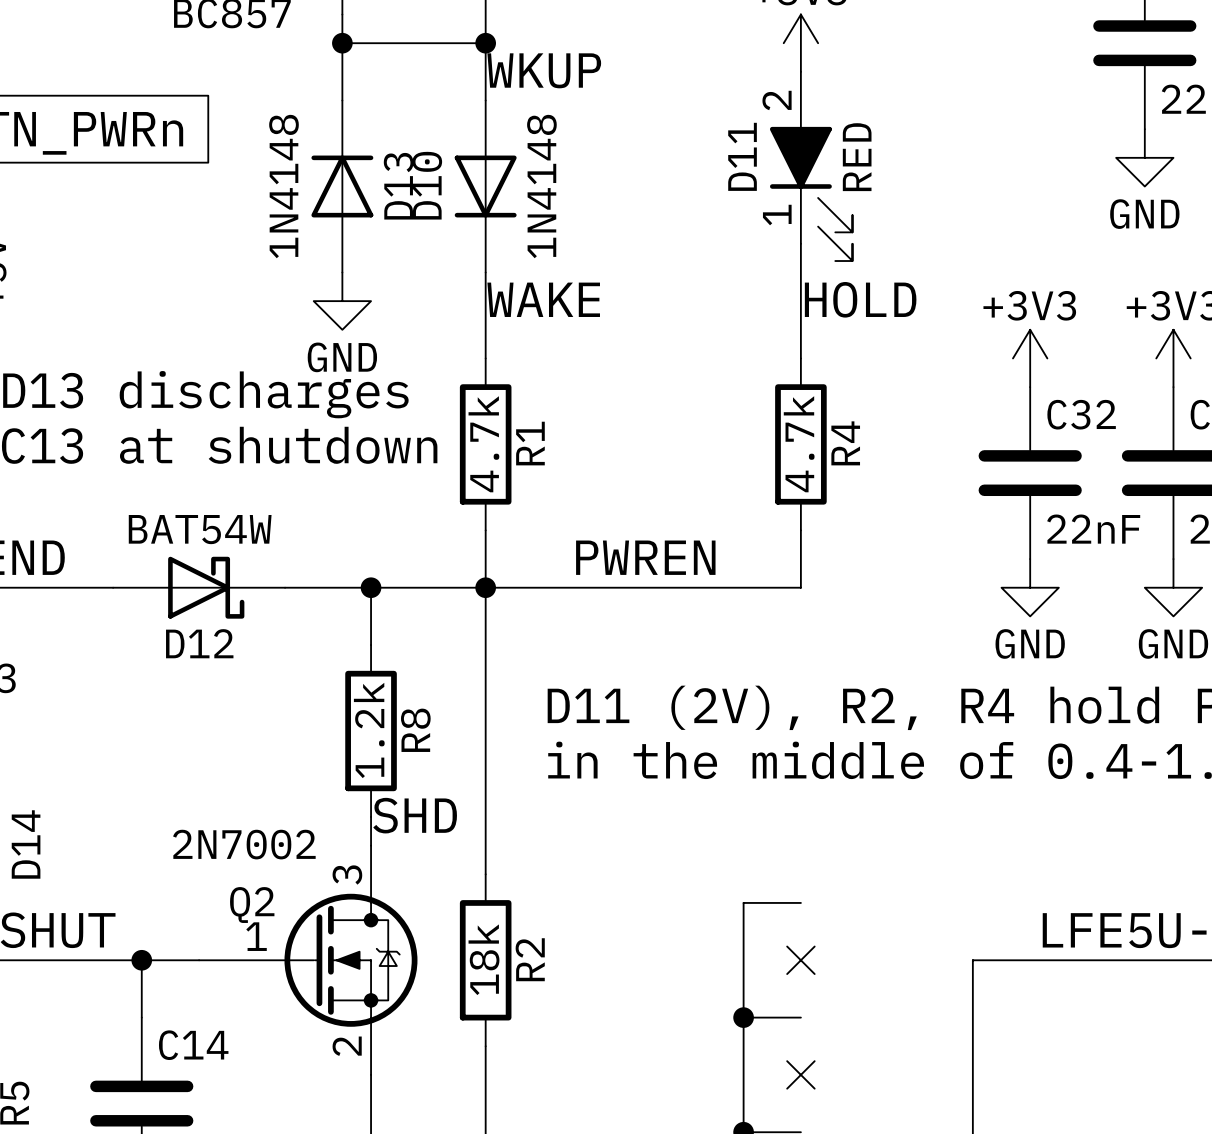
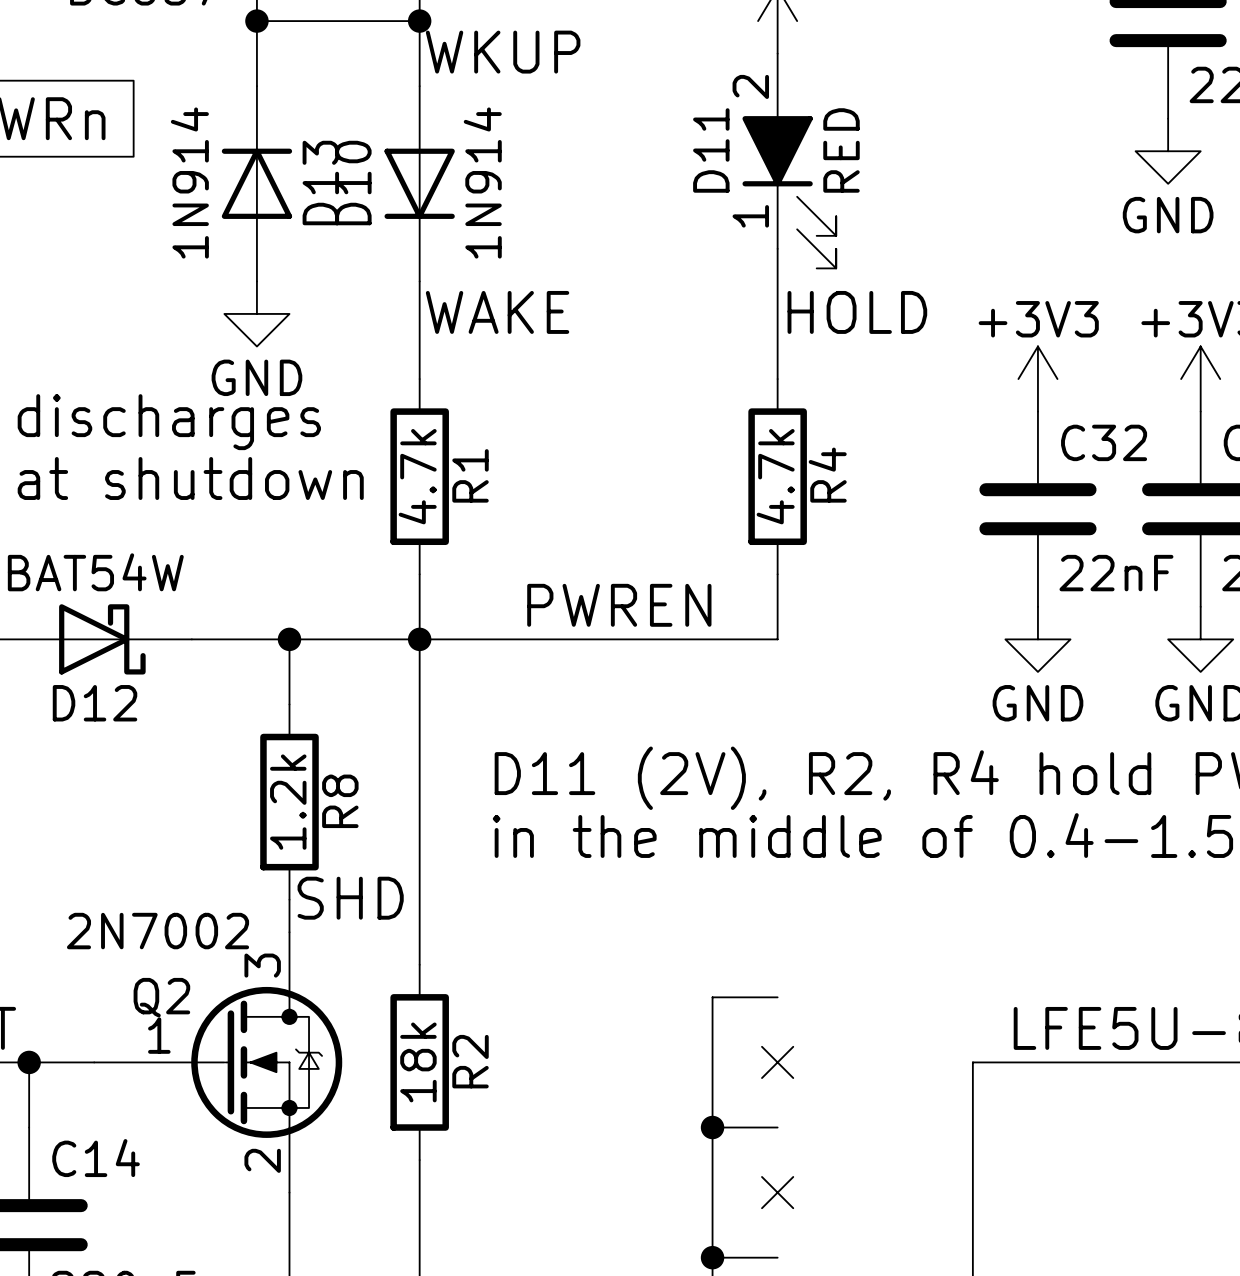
D13 value: 1N4148 (283, 186) -> 1N914 (189, 183)
D10 value: 1N4148 (541, 186) -> 1N914 (482, 183)

